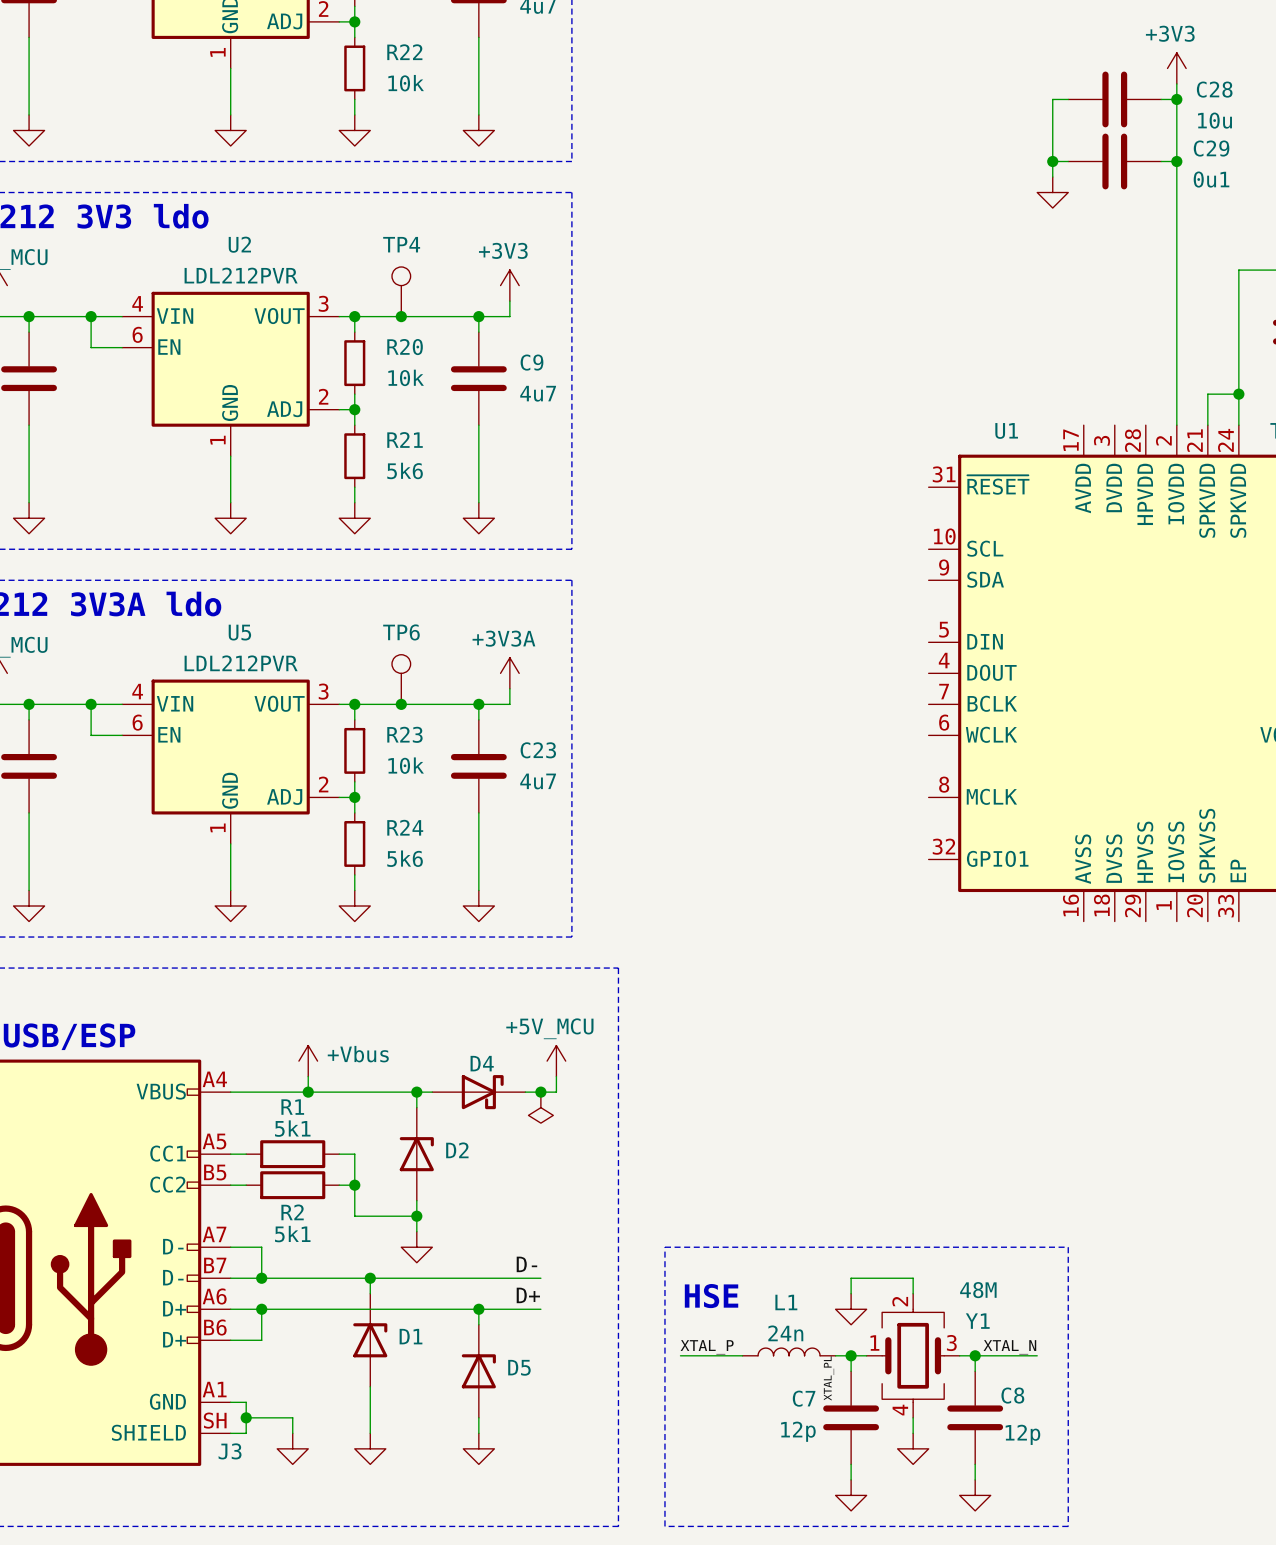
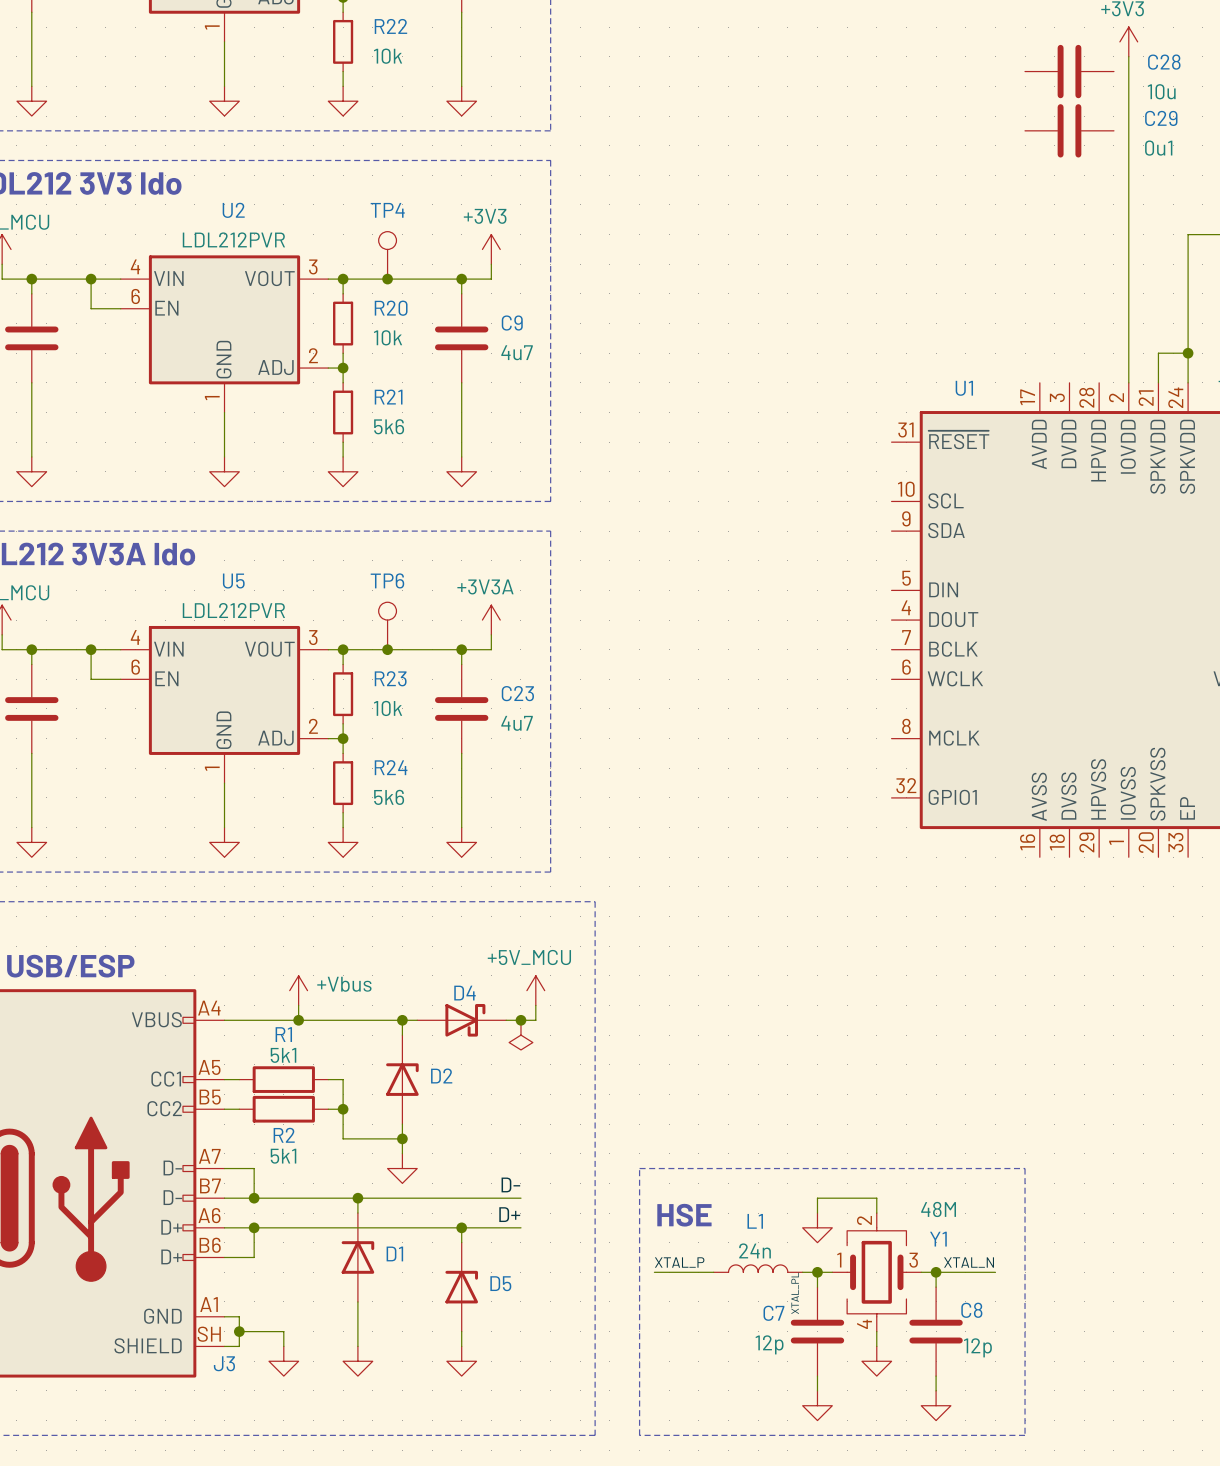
wire: (1068, 99) (1052, 99) (1052, 177) -> none
wire: (1161, 99) (1176, 99) -> none
junction: (1176, 99) -> none
wire: (1052, 161) (1068, 161) -> none
junction: (1052, 161) -> none
wire: (1161, 161) (1176, 161) -> none
junction: (1176, 161) -> none
power symbol: (1052, 192) -> none

